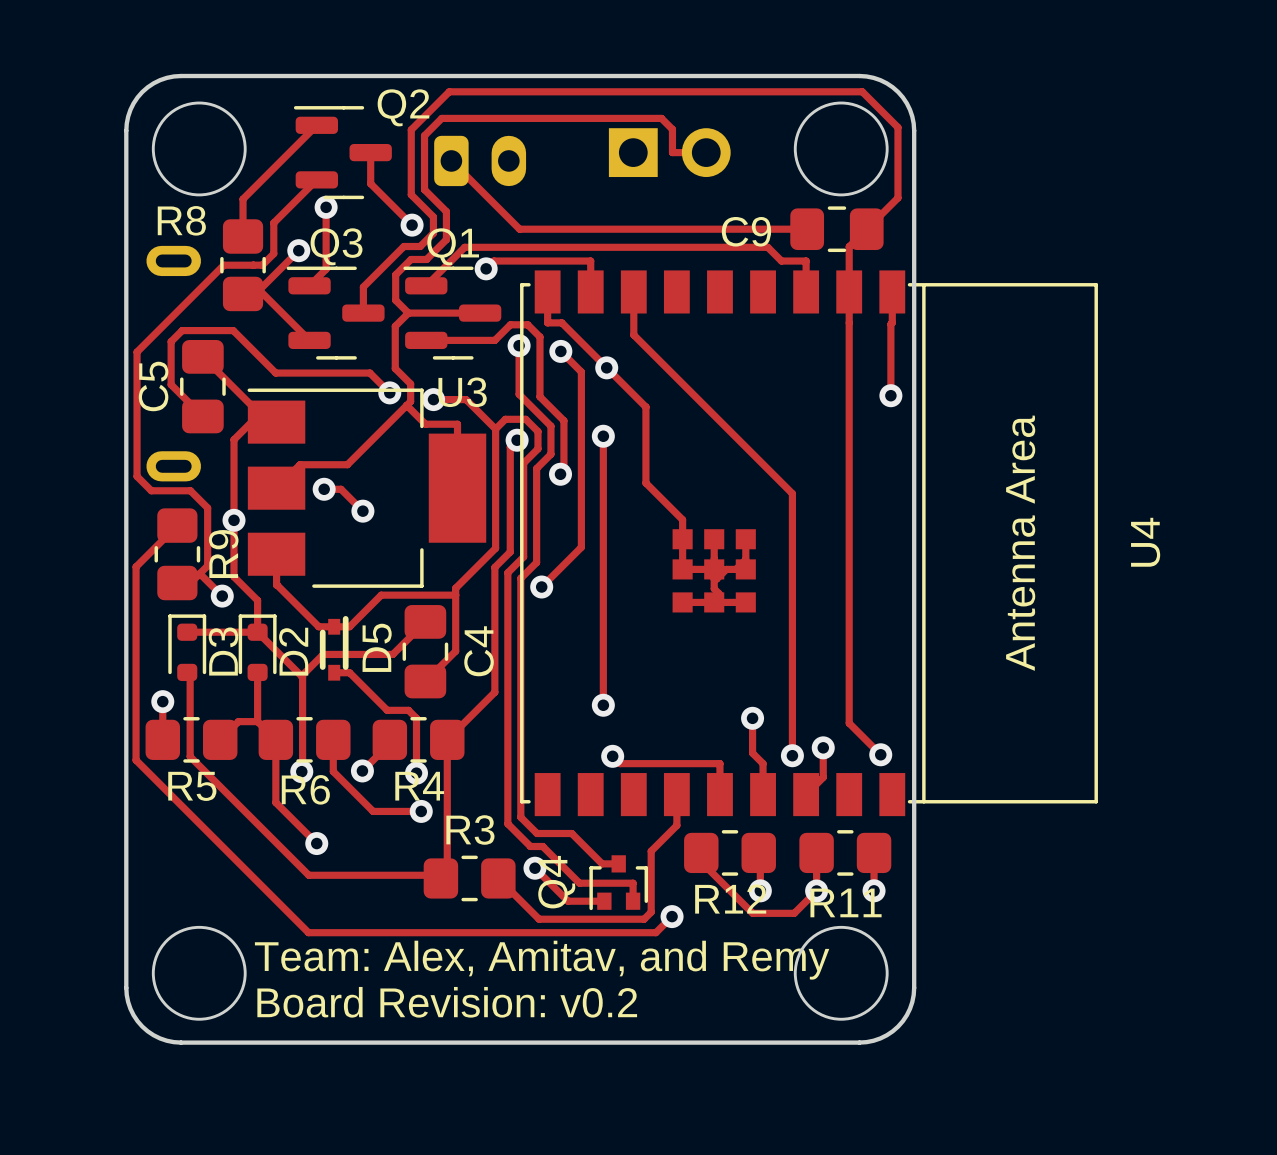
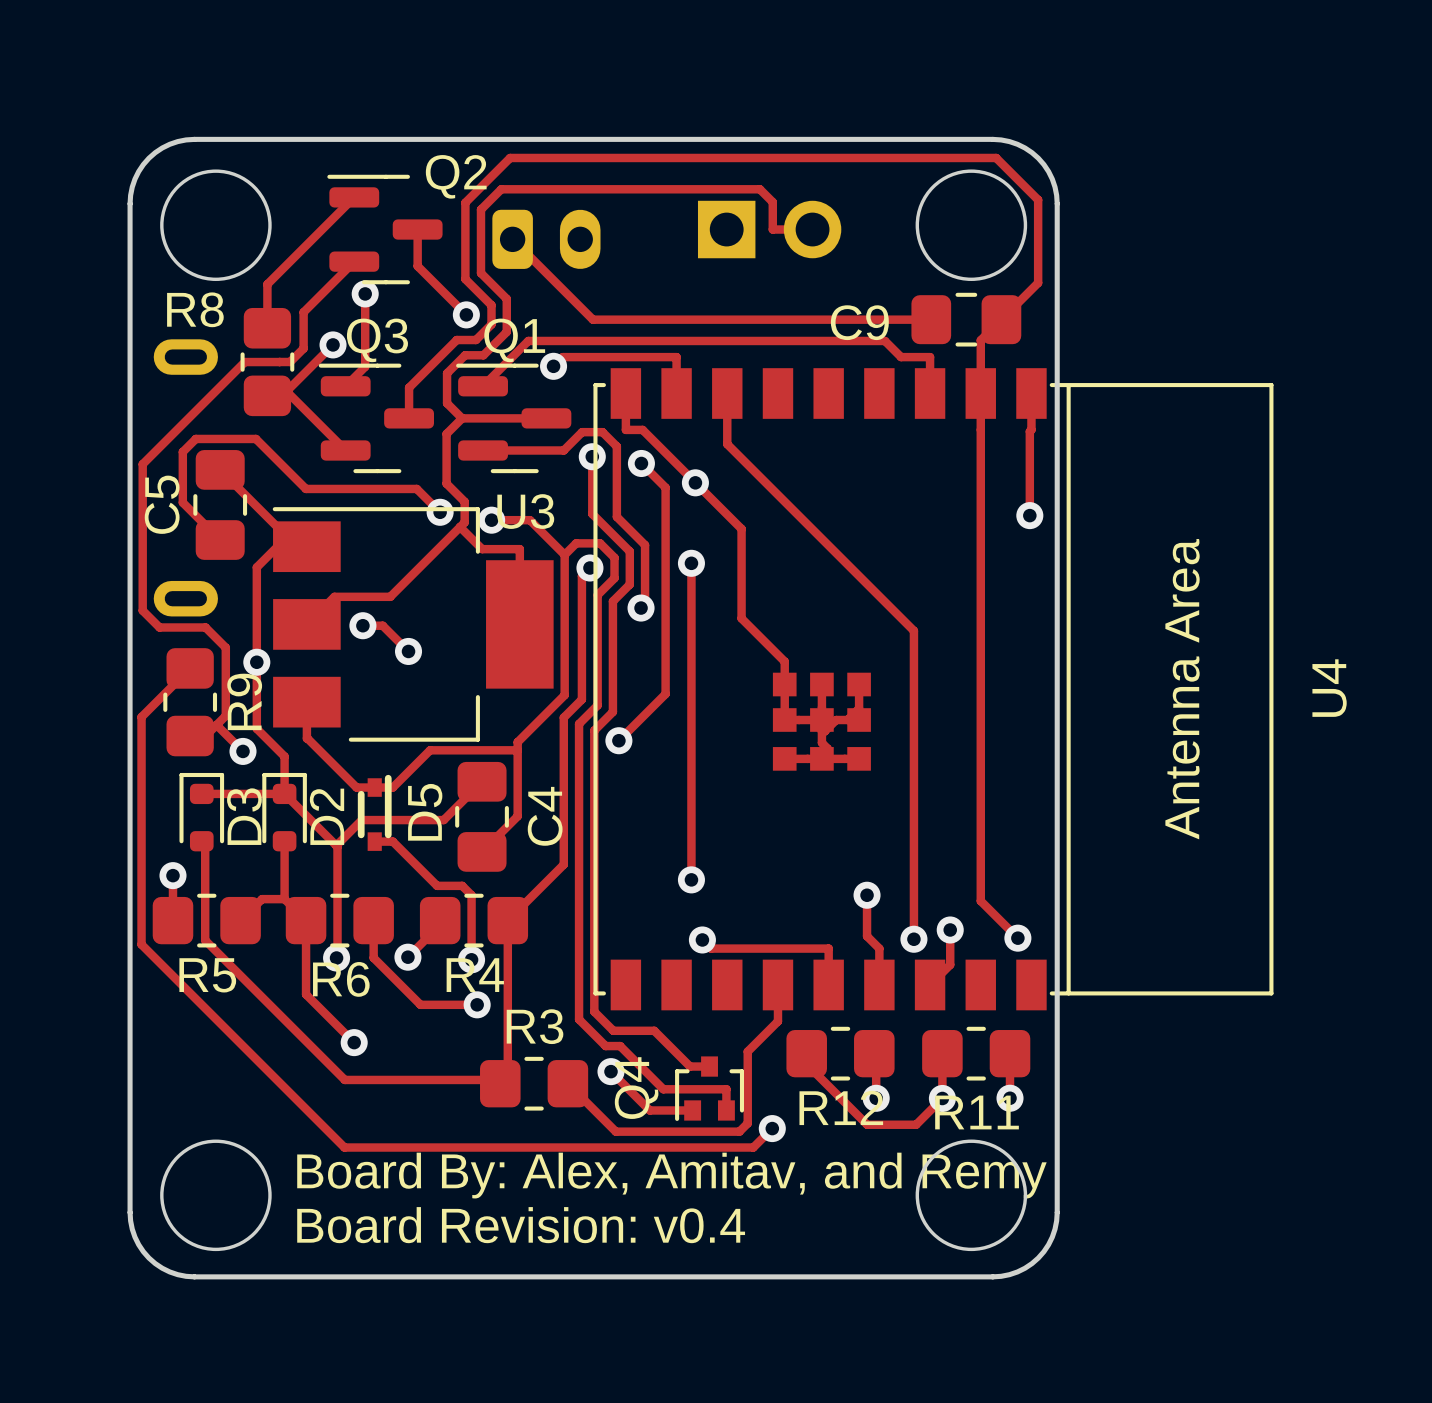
text: Team: Alex, Amitav, and Remy (542, 960) -> Board By: Alex, Amitav, and Remy (671, 1175)
text: Board Revision: v0.2 (447, 1002) -> Board Revision: v0.4 (521, 1225)

